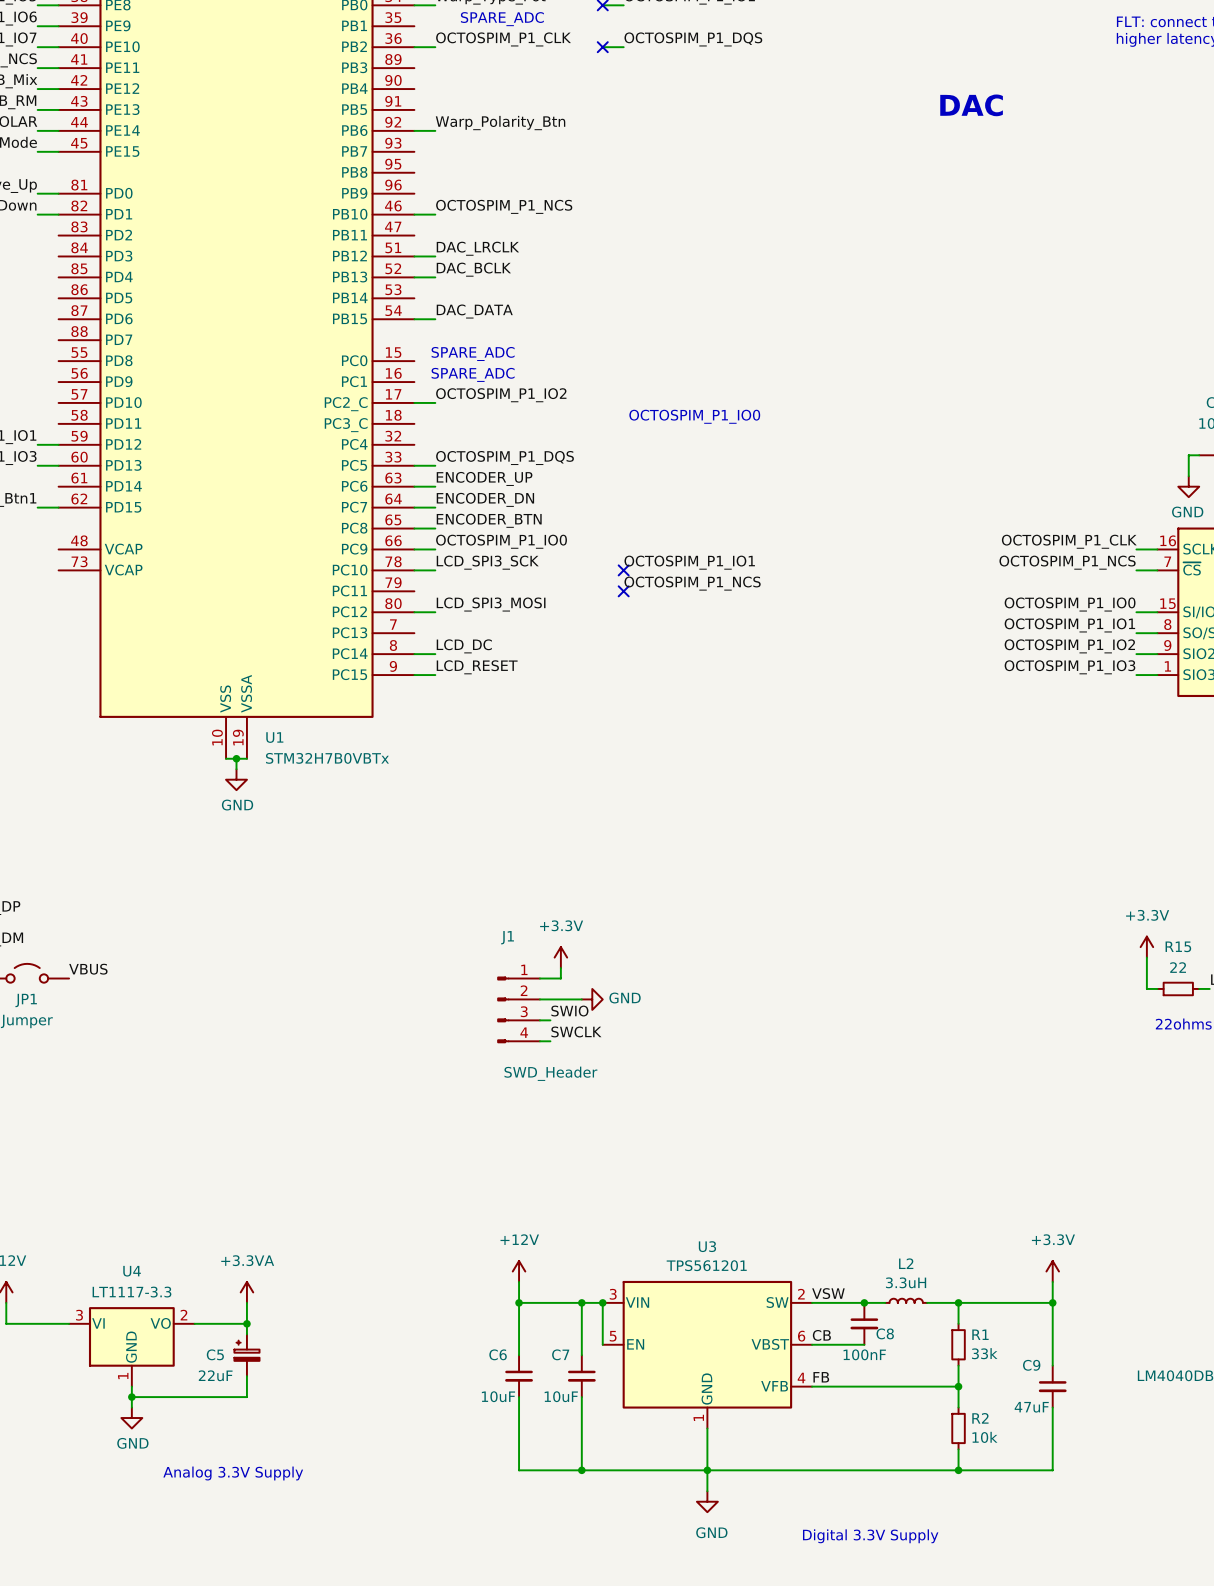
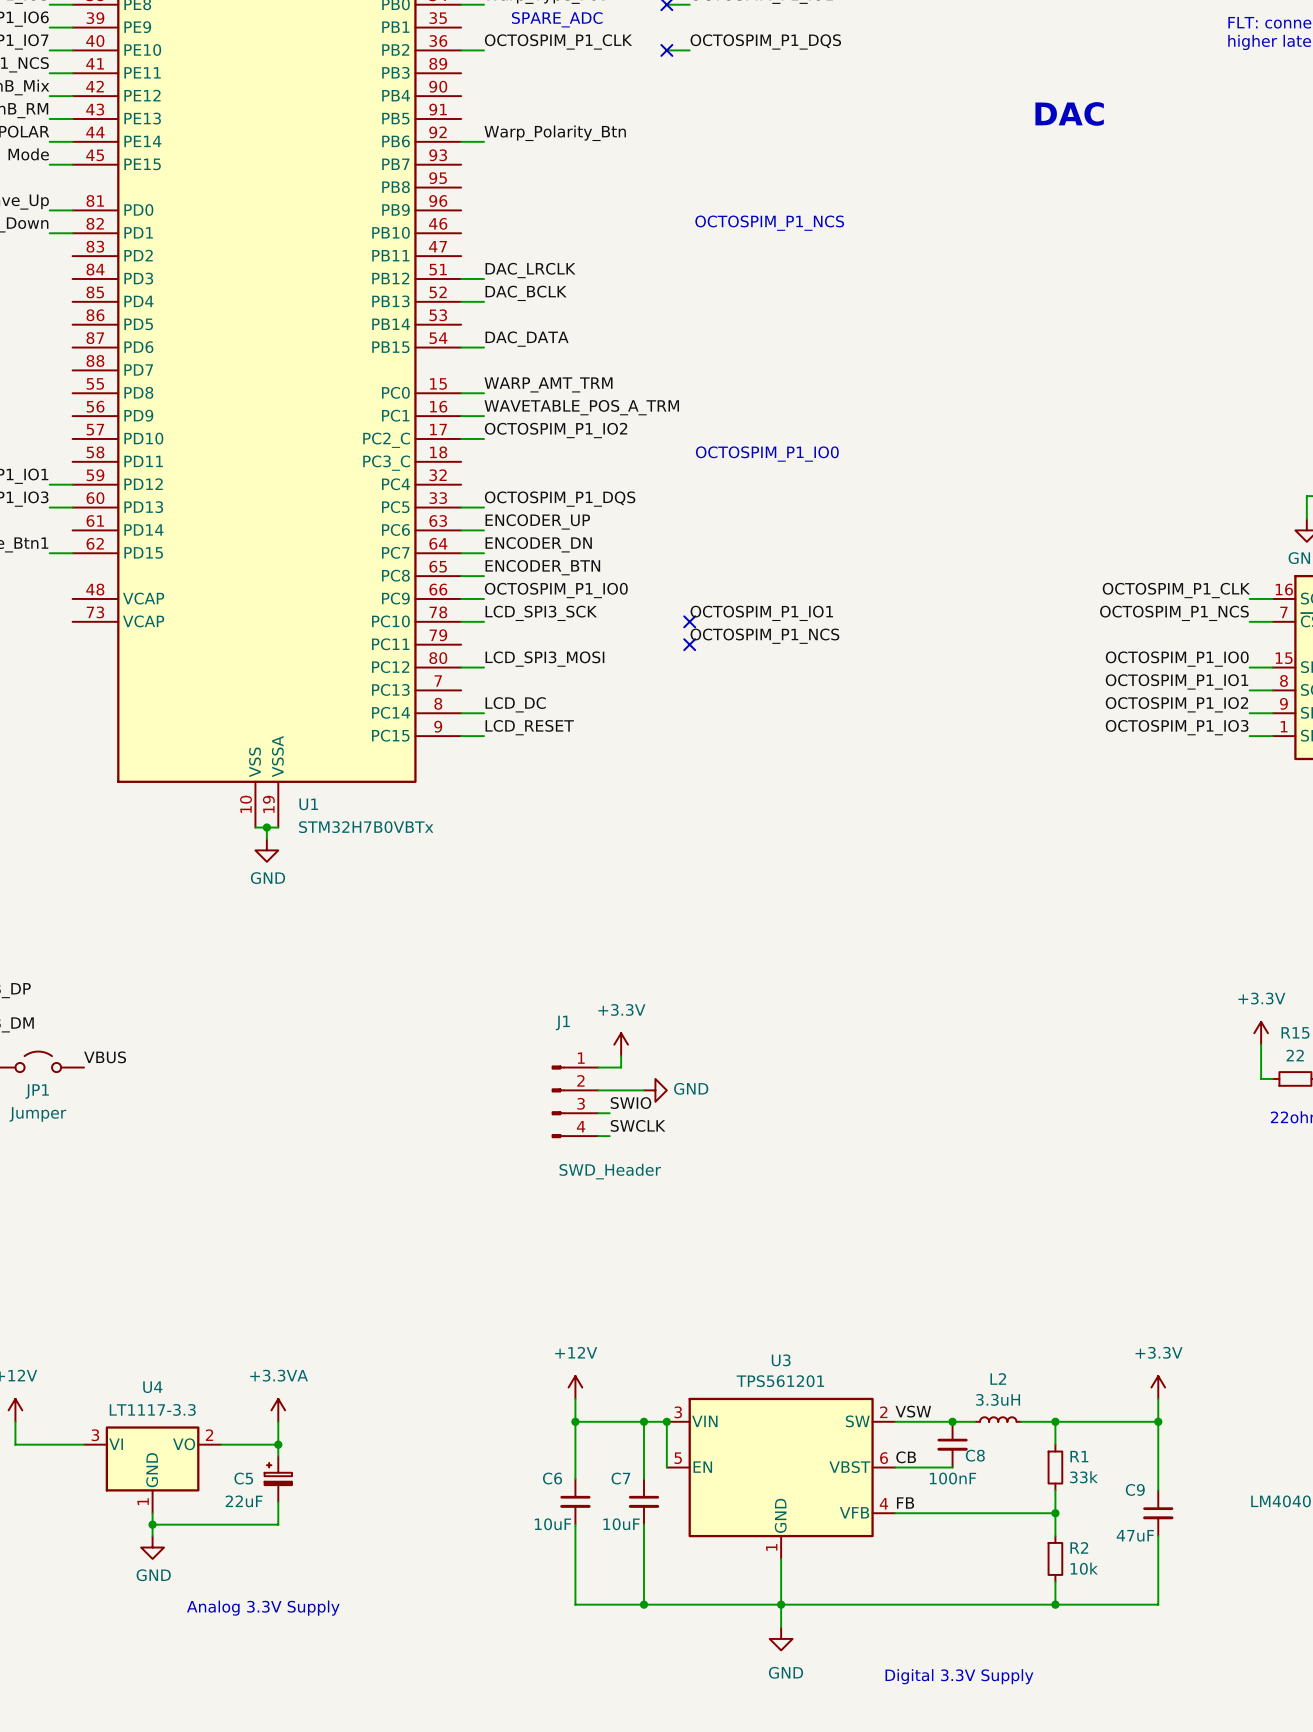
text: none -> OCTOSPIM_P1_NCS (769, 223)
label: OCTOSPIM_P1_NCS (504, 206) -> none
wire: (414, 214) (435, 214) -> (461, 393) (484, 393)
text: SPARE_ADC (473, 353) -> none
label: none -> WARP_AMT_TRM (548, 384)
text: SPARE_ADC (473, 374) -> none
label: none -> WAVETABLE_POS_A_TRM (581, 407)
wire: none -> (461, 416) (484, 416)

